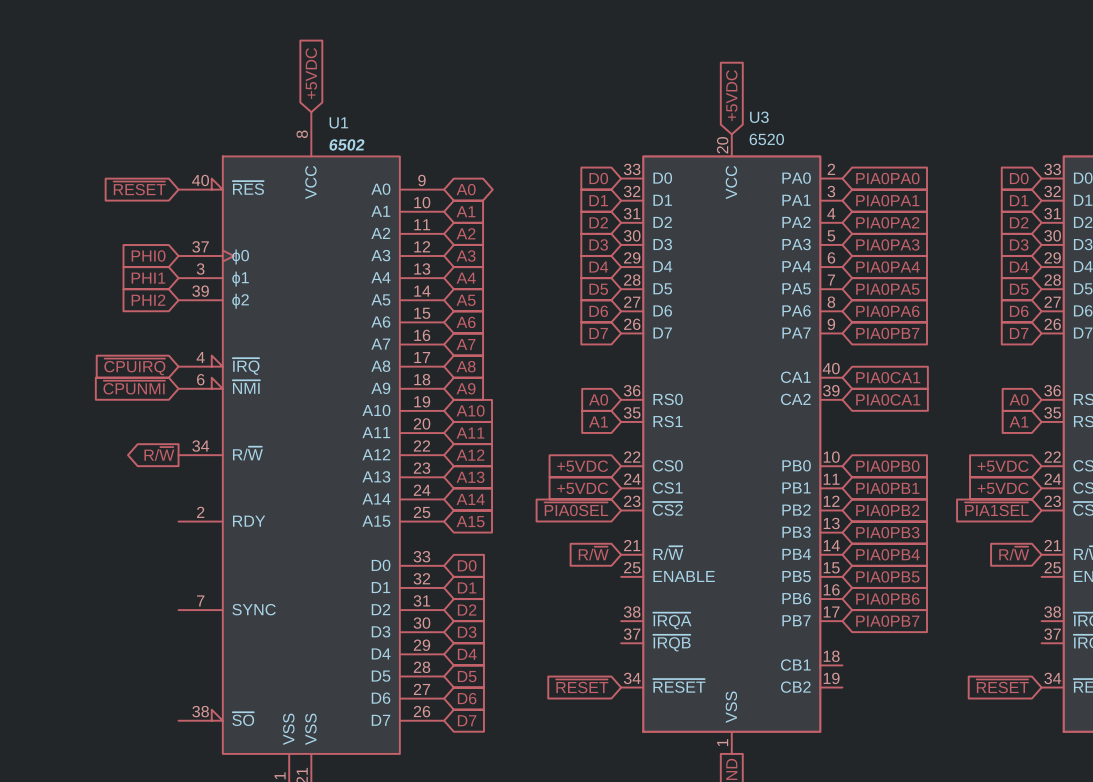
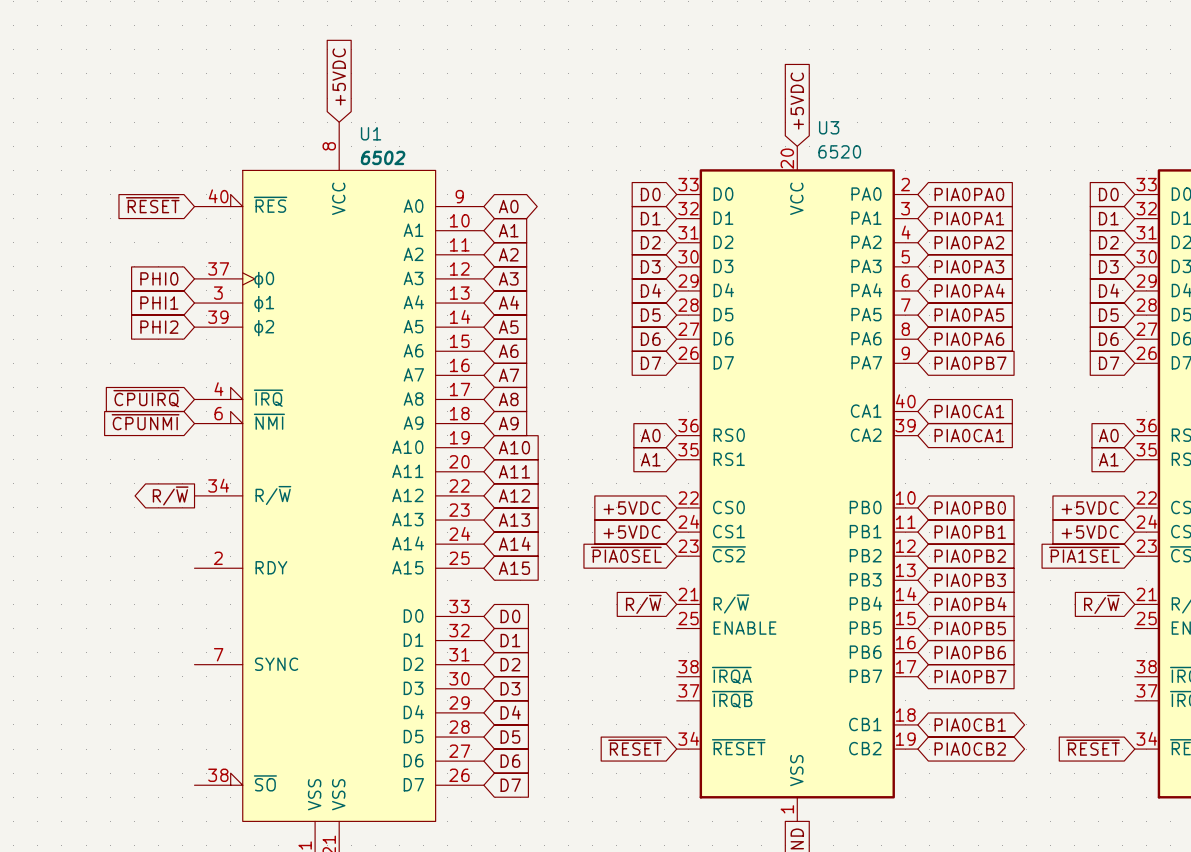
global label: none -> PIA0CB1 (970, 724)
global label: none -> PIA0CB2 (970, 749)

